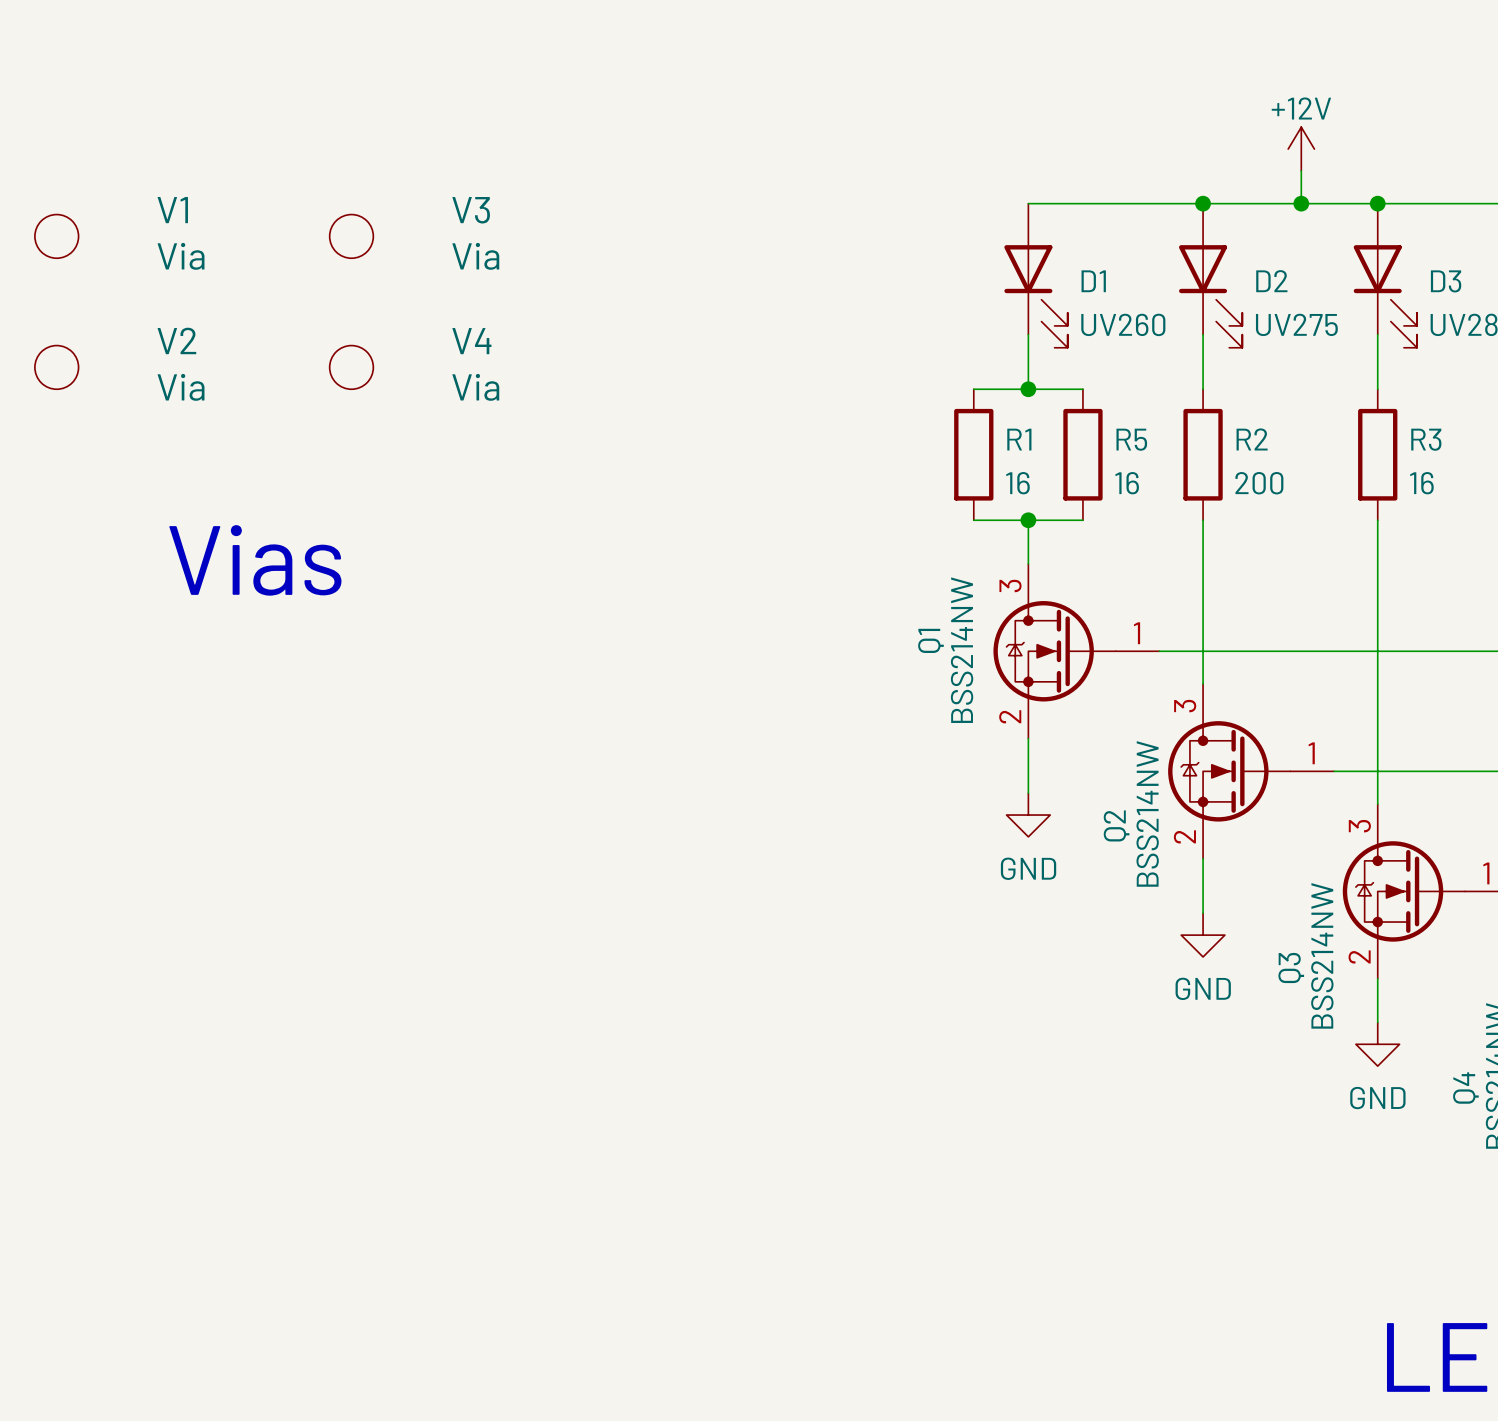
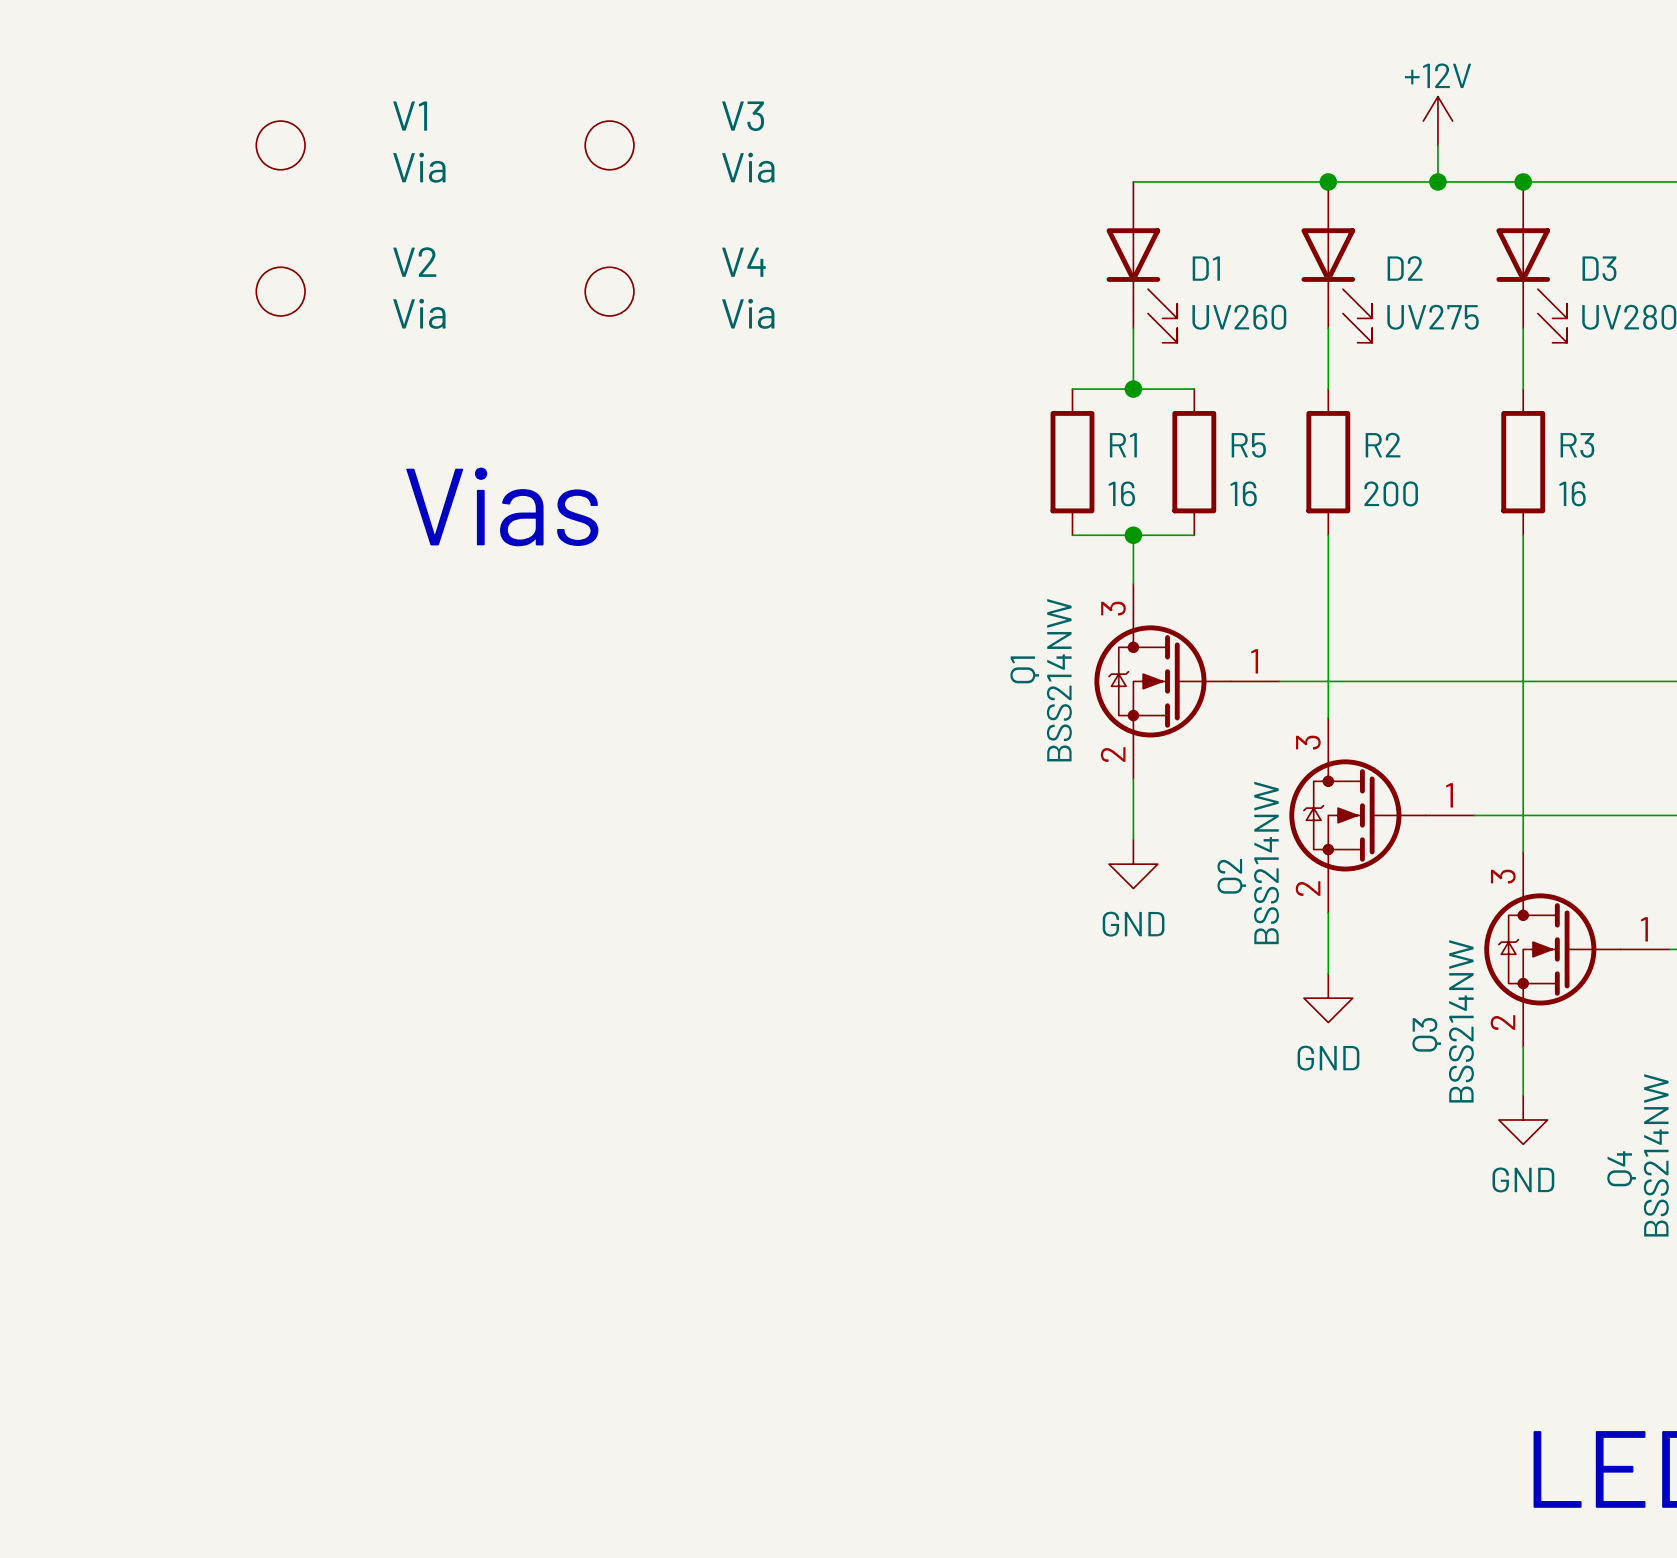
V1 position: (56, 236) -> (280, 145)
V3 position: (351, 236) -> (609, 145)
V2 position: (56, 367) -> (280, 291)
V4 position: (351, 367) -> (609, 291)
text position: Vias (255, 560) -> Vias (502, 506)

